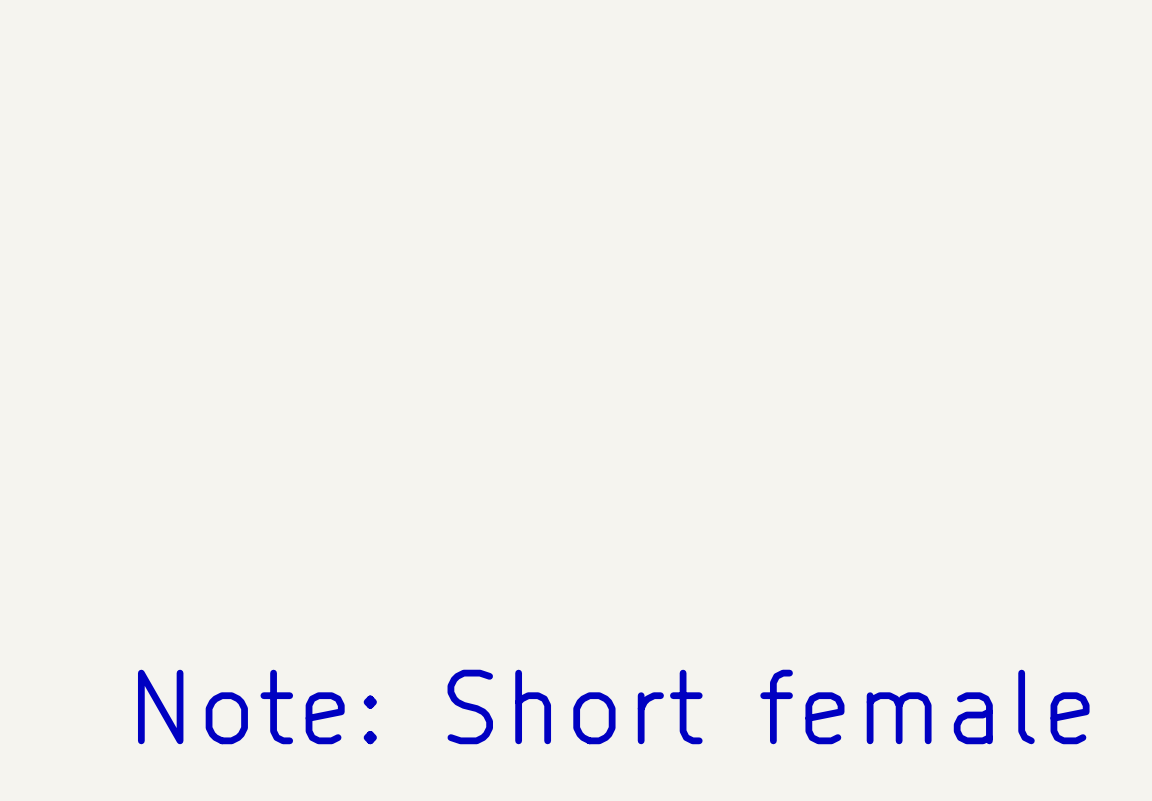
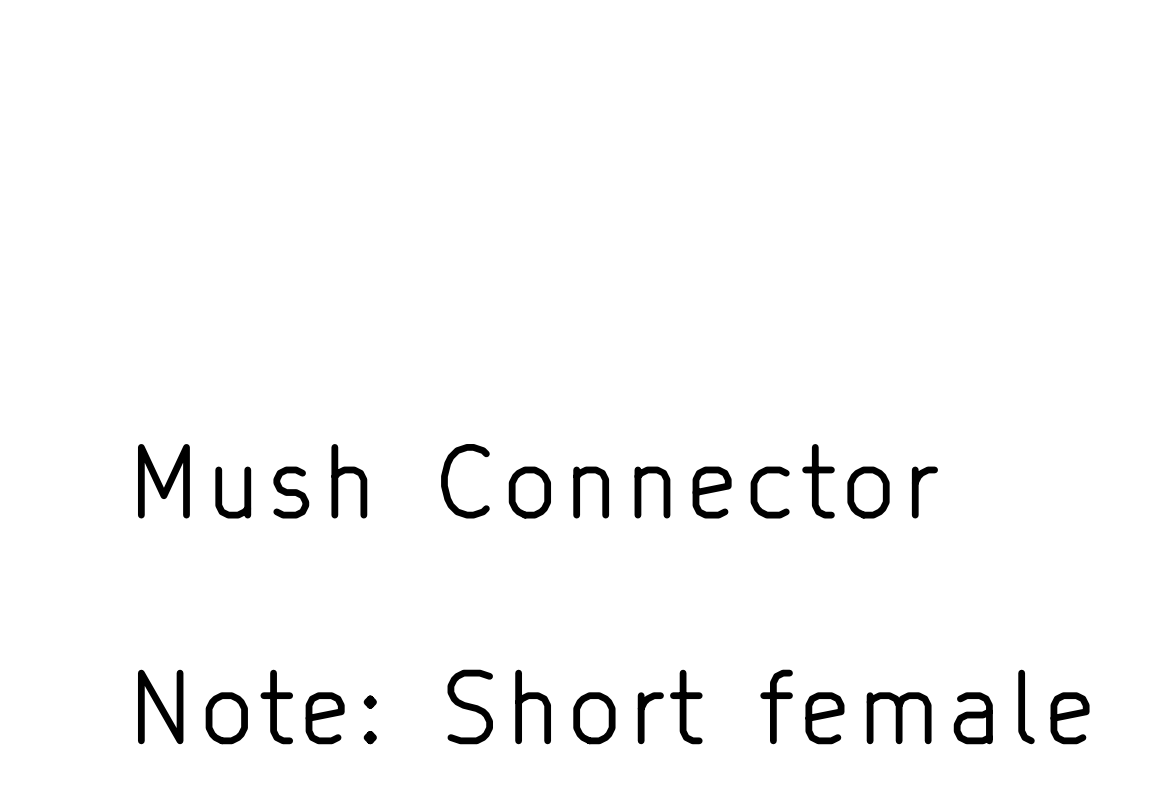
text: none -> Mush Connector (537, 481)

